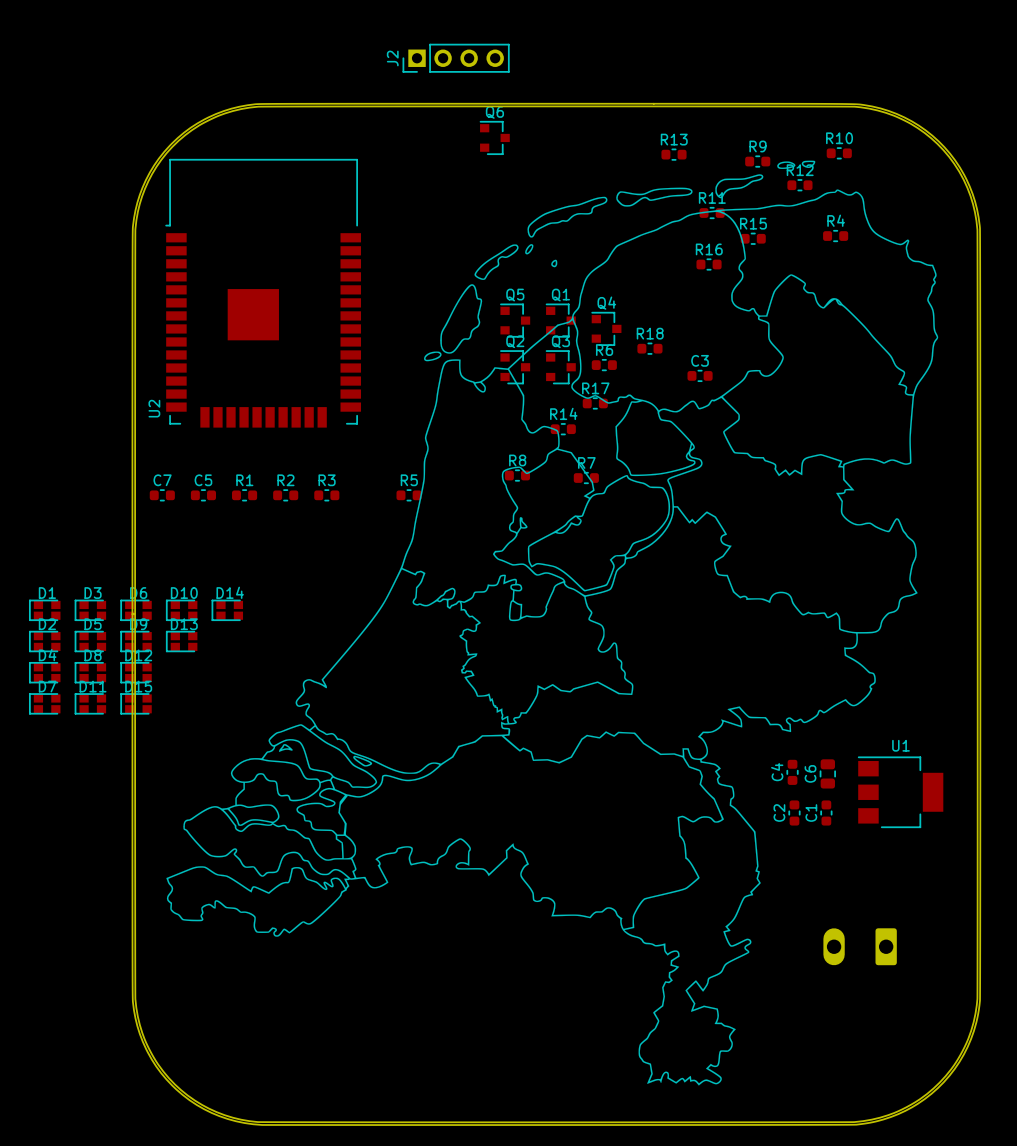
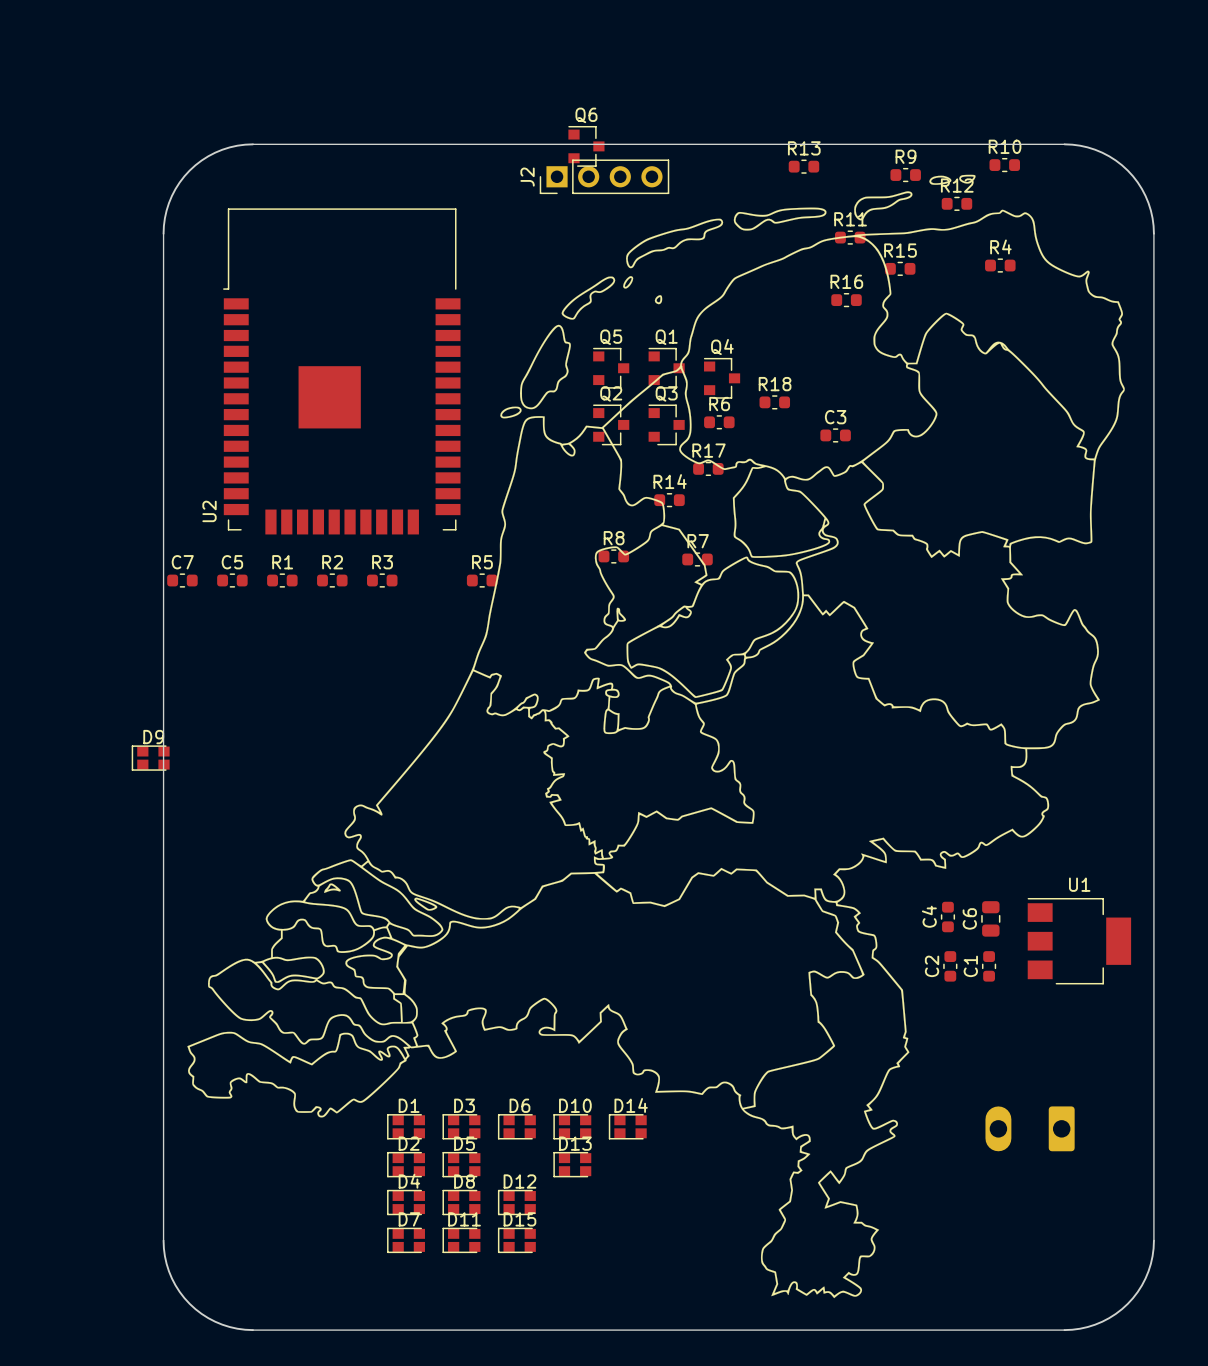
J2 position: (456, 58) -> (604, 176)
drawing: [132, 103, 981, 1126] -> none
board edge: none -> (252, 144) (1064, 144) (1087, 147) (1109, 156) (1127, 170) (1137, 182) (1150, 210) (1153, 233) (1153, 1240) (1152, 1256) (1145, 1278) (1133, 1298) (1115, 1313) (1095, 1324) (1064, 1330) (252, 1330) (229, 1327) (208, 1318) (189, 1303) (179, 1291) (166, 1263) (163, 1240) (163, 225) (171, 195) (184, 176) (195, 165) (222, 149) (252, 144)
drawing: none -> [187, 174, 1125, 1299]
U2 position: (263, 293) -> (341, 371)
D1 position: (44, 610) -> (406, 1126)
D3 position: (90, 610) -> (461, 1126)
D6 position: (136, 610) -> (516, 1126)
D10 position: (181, 610) -> (572, 1126)
D14 position: (227, 610) -> (627, 1126)
D2 position: (44, 641) -> (406, 1164)
D5 position: (90, 641) -> (461, 1164)
D13 position: (181, 641) -> (572, 1164)
D4 position: (44, 672) -> (406, 1202)
D8 position: (90, 672) -> (461, 1202)
D12 position: (136, 672) -> (516, 1202)
D7 position: (44, 703) -> (406, 1240)
D11 position: (90, 703) -> (461, 1240)
D15 position: (136, 703) -> (516, 1240)

